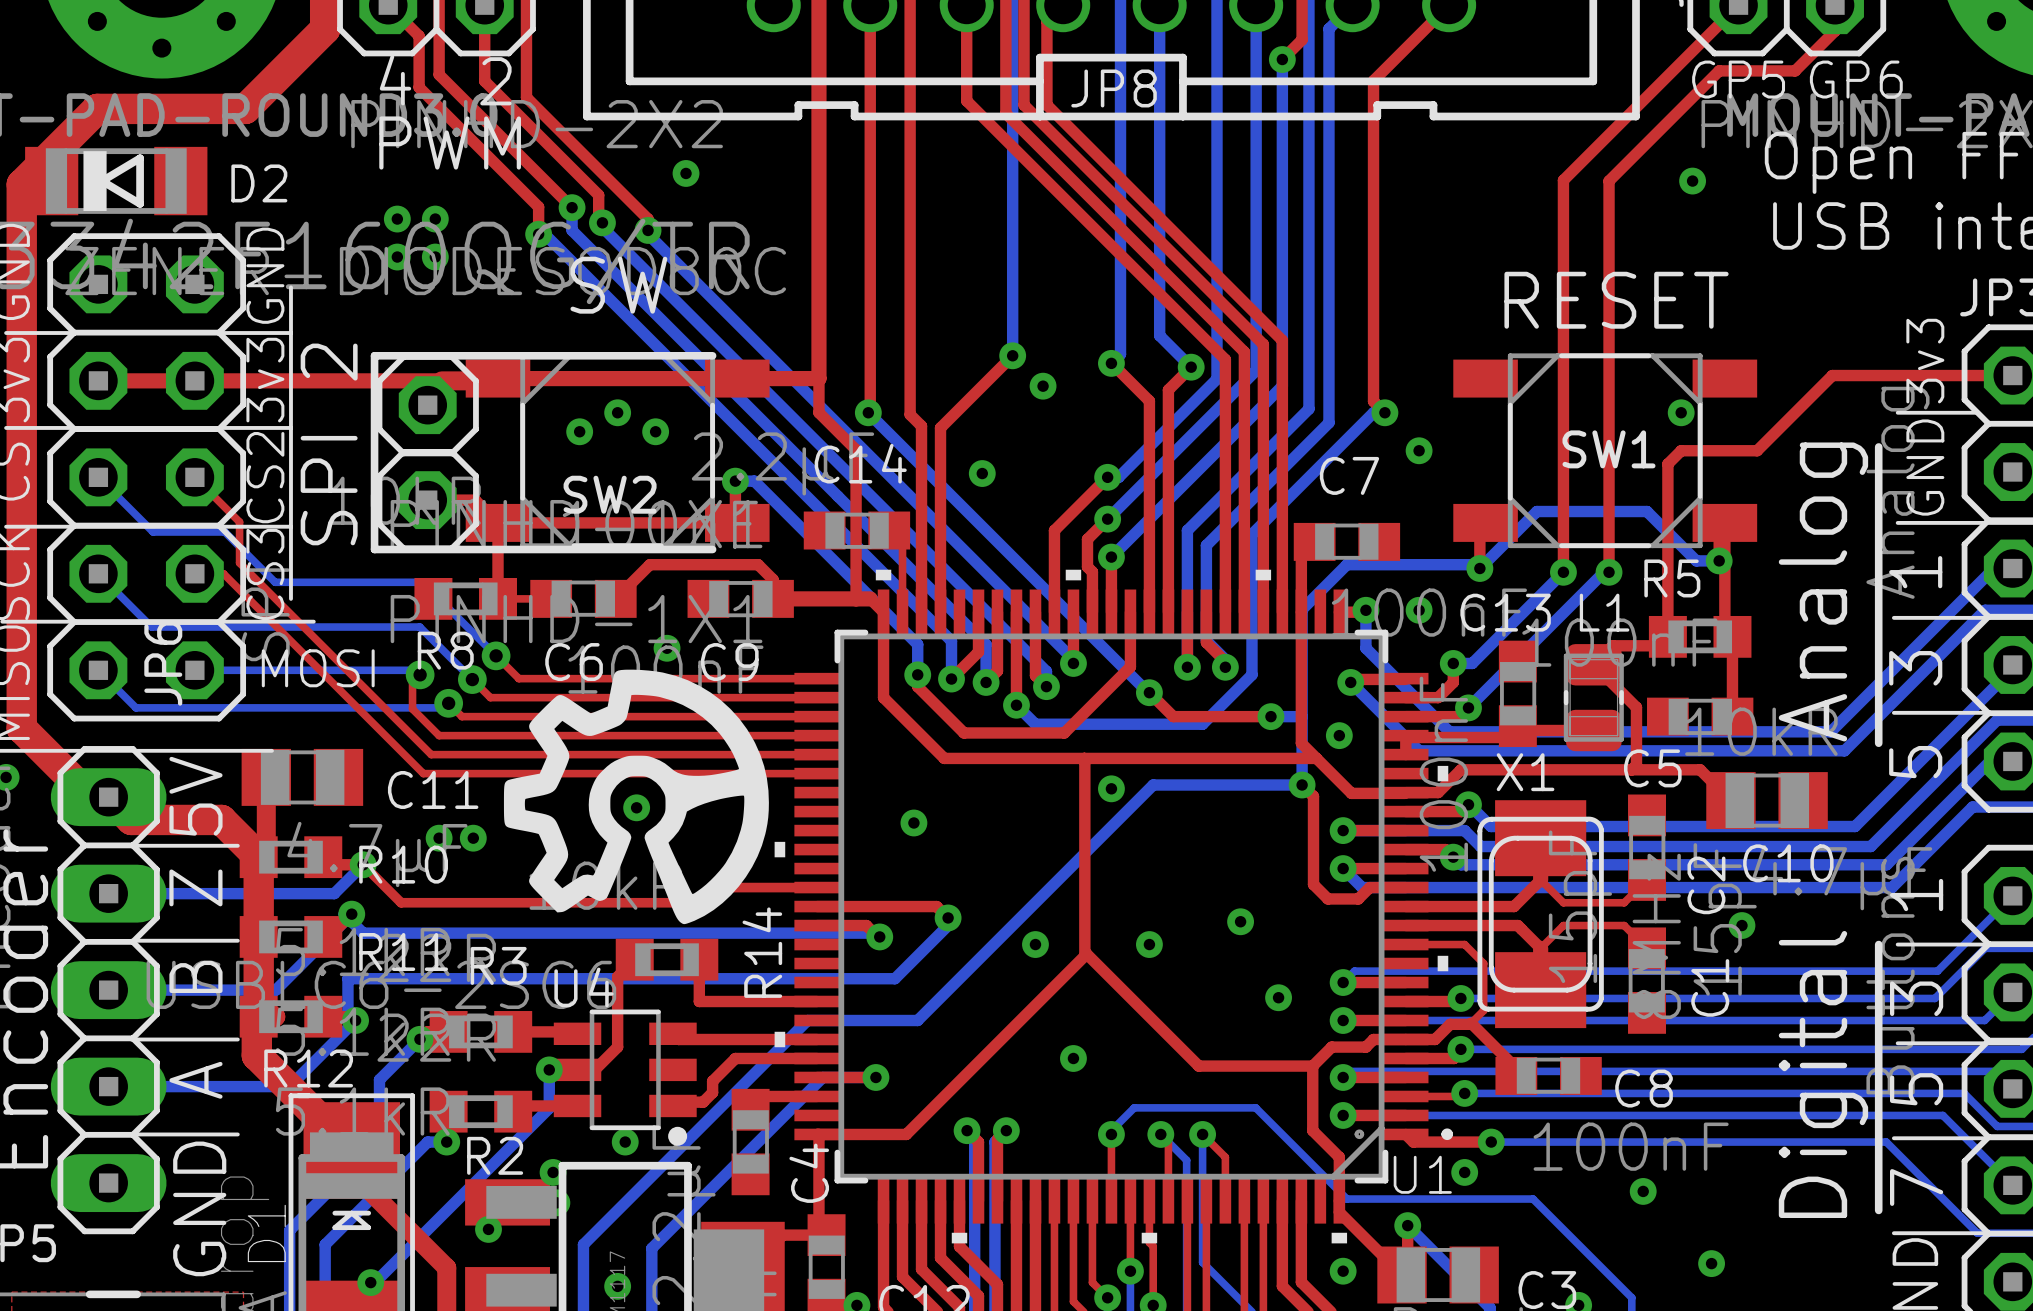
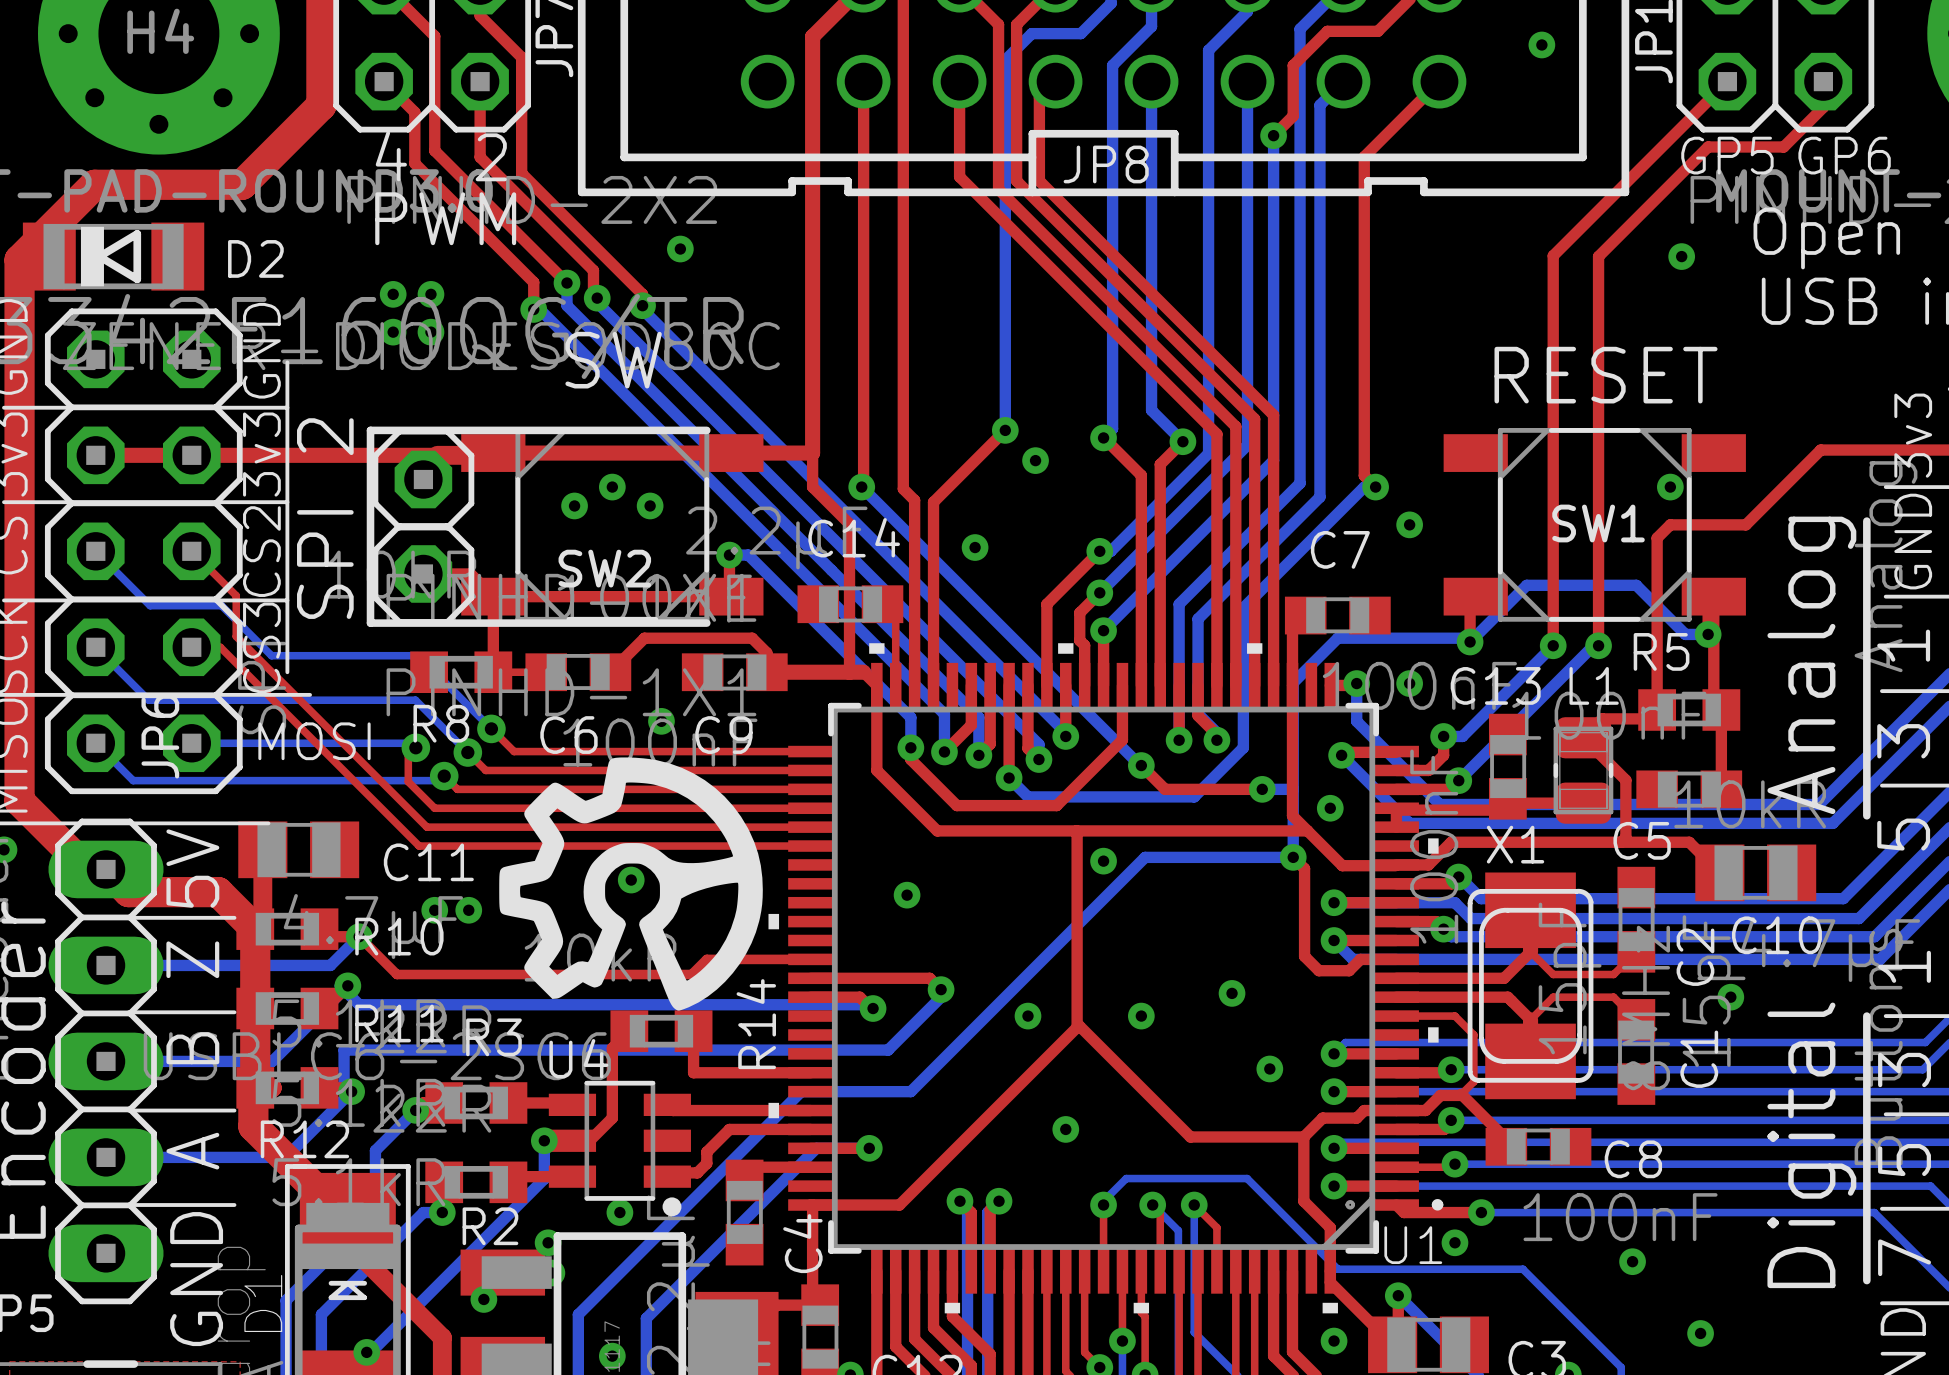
drawing position: (636, 796) -> (631, 884)

